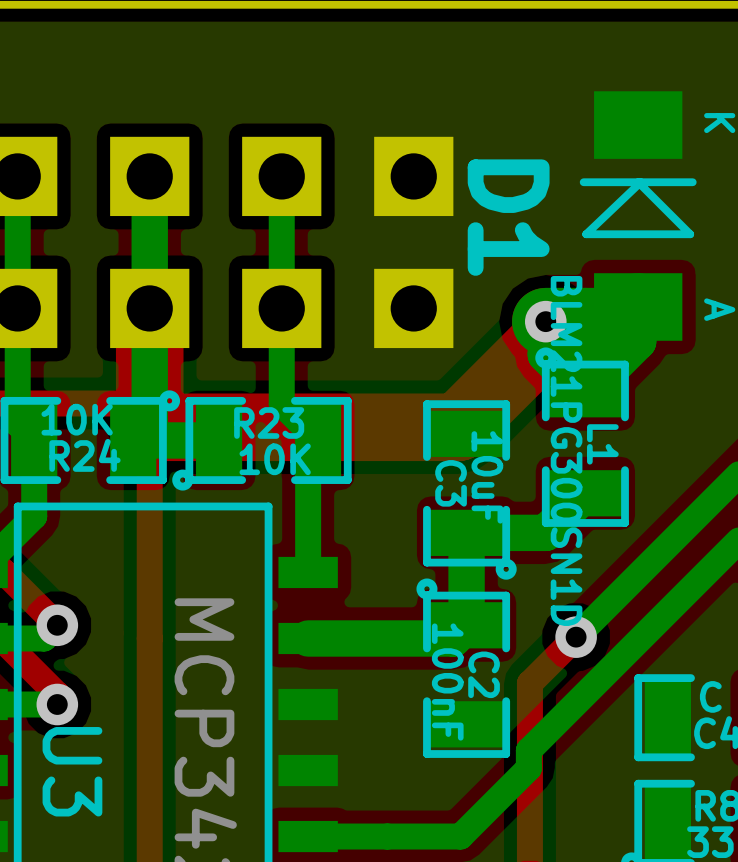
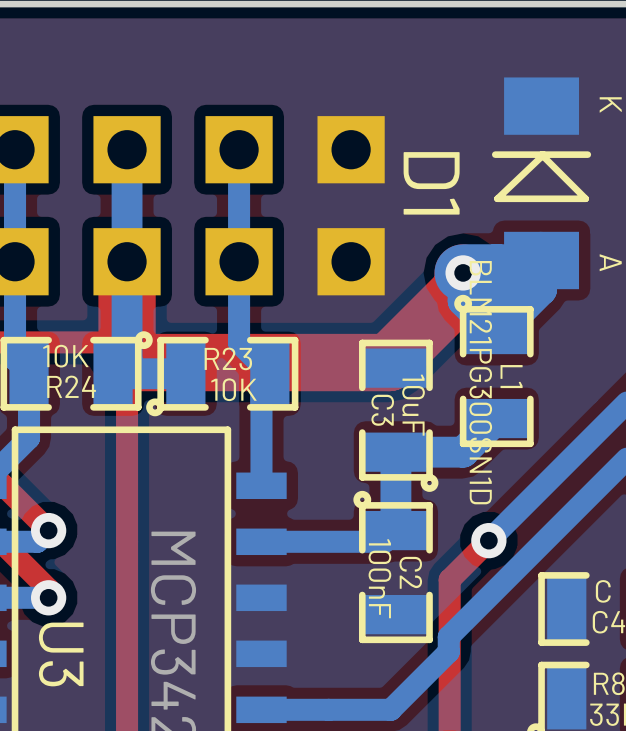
bottom track width: thick (466, 625) (453, 638) (308, 638) -> thin (395, 530) (384, 541) (261, 541)

